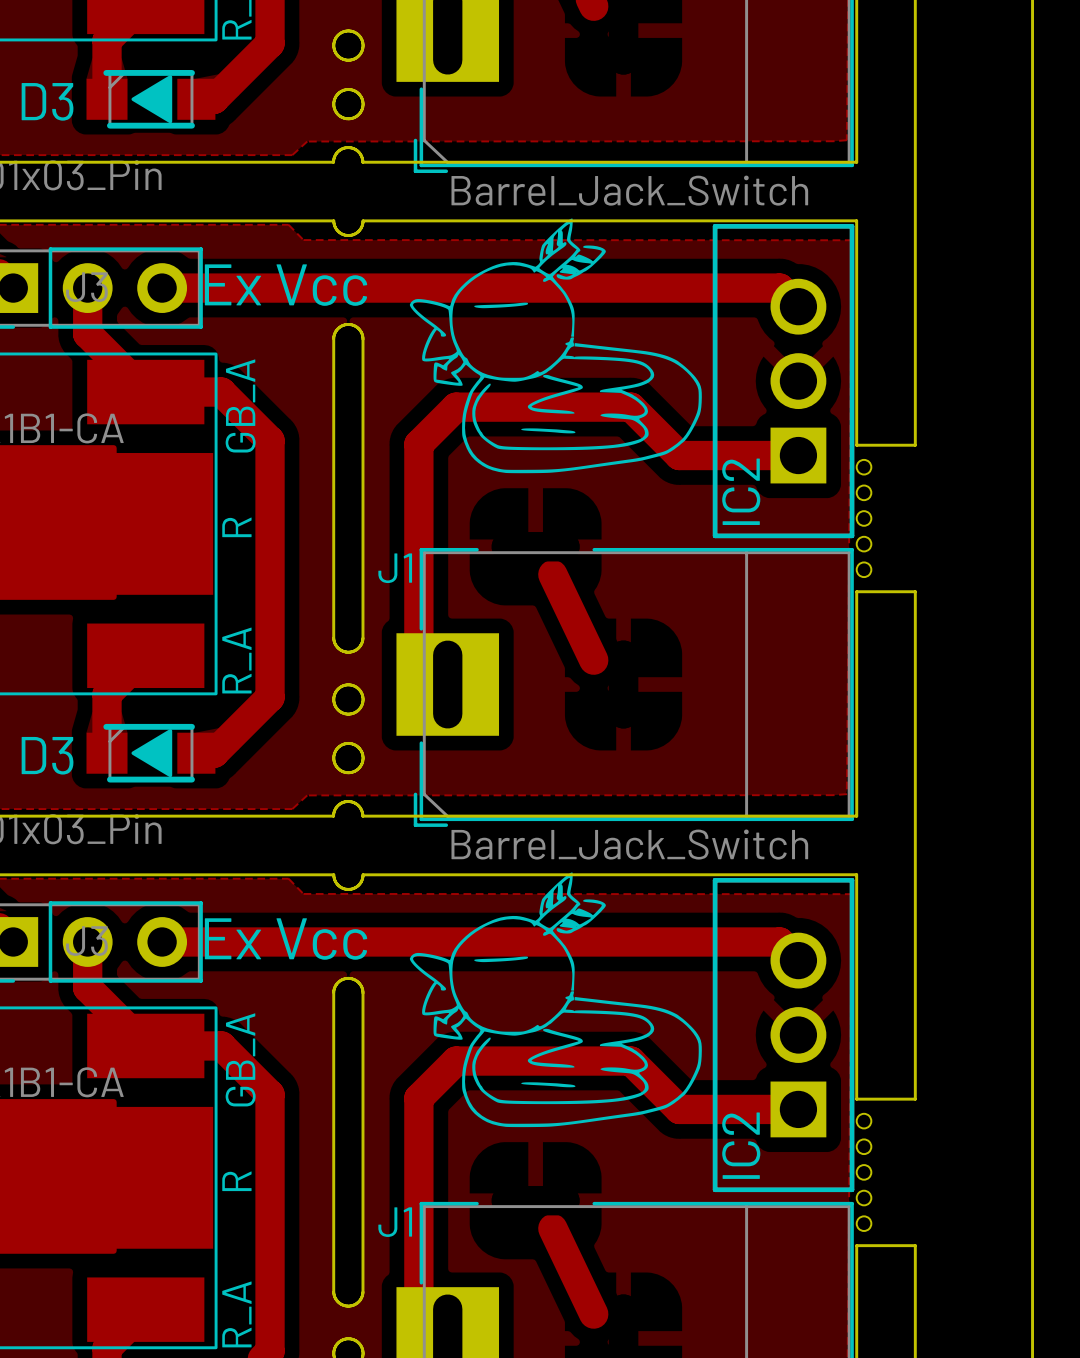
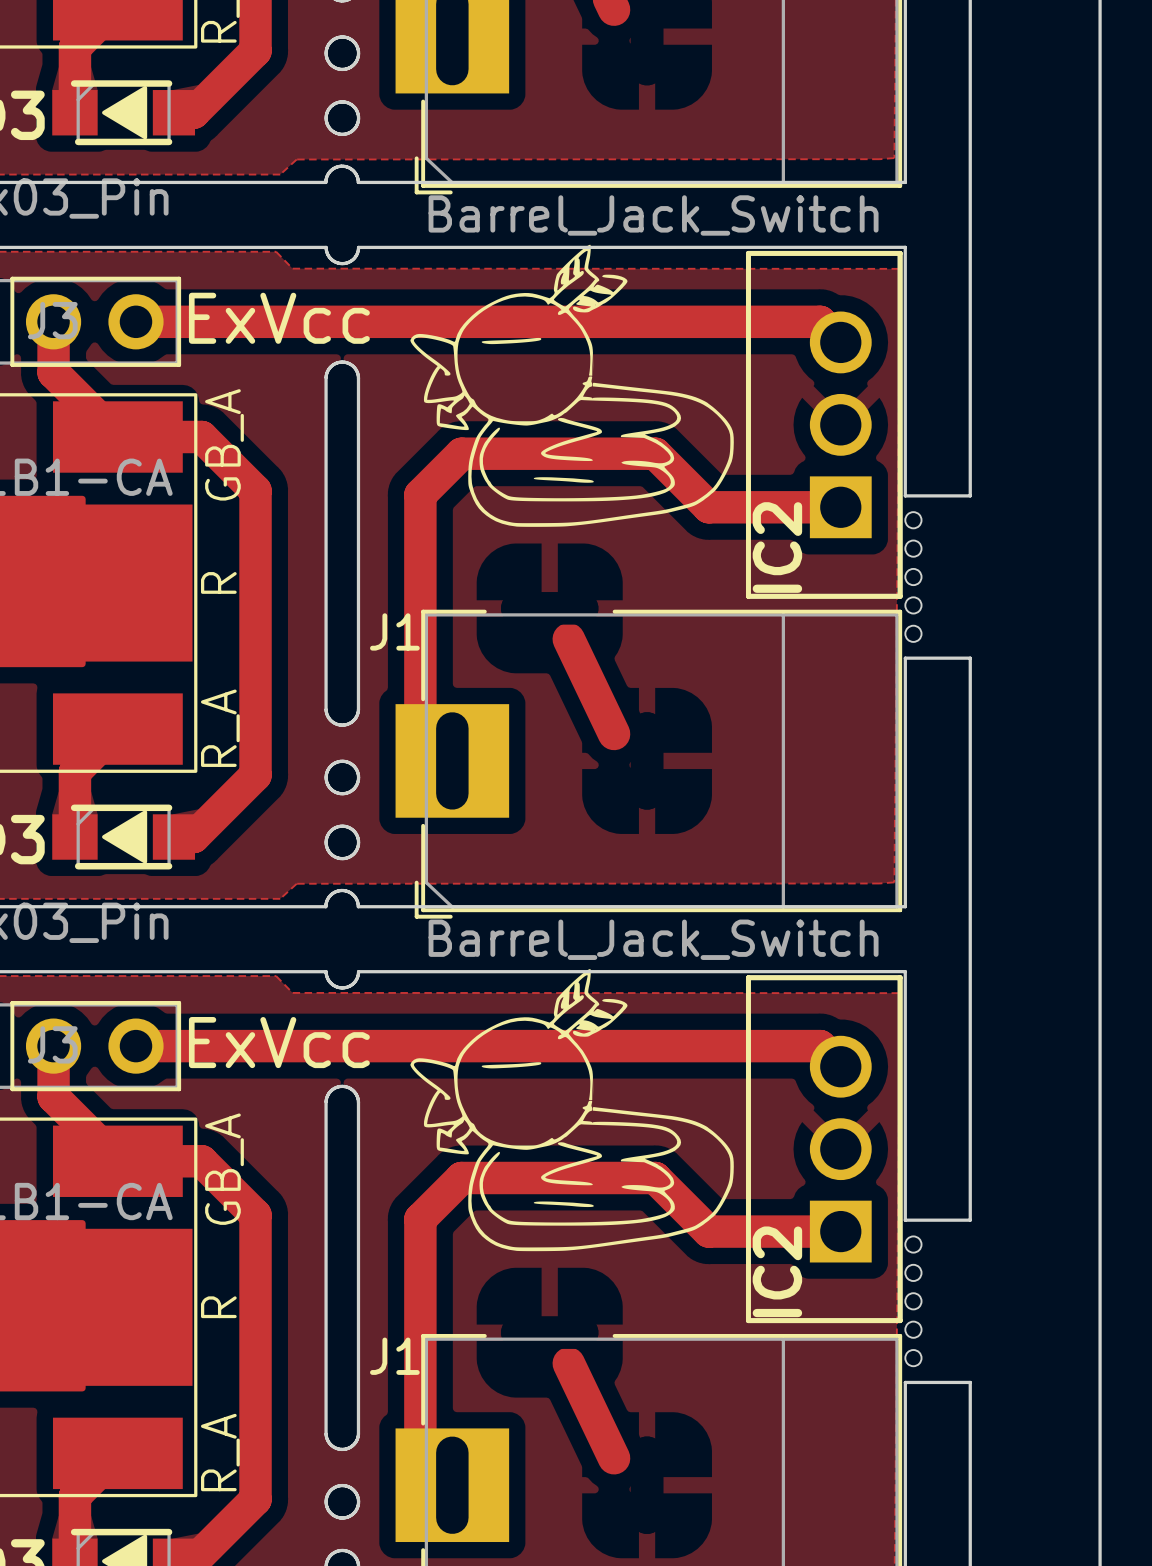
text: Ex Vcc (286, 285) -> ExVcc (279, 318)
text: Ex Vcc (286, 939) -> ExVcc (279, 1042)

